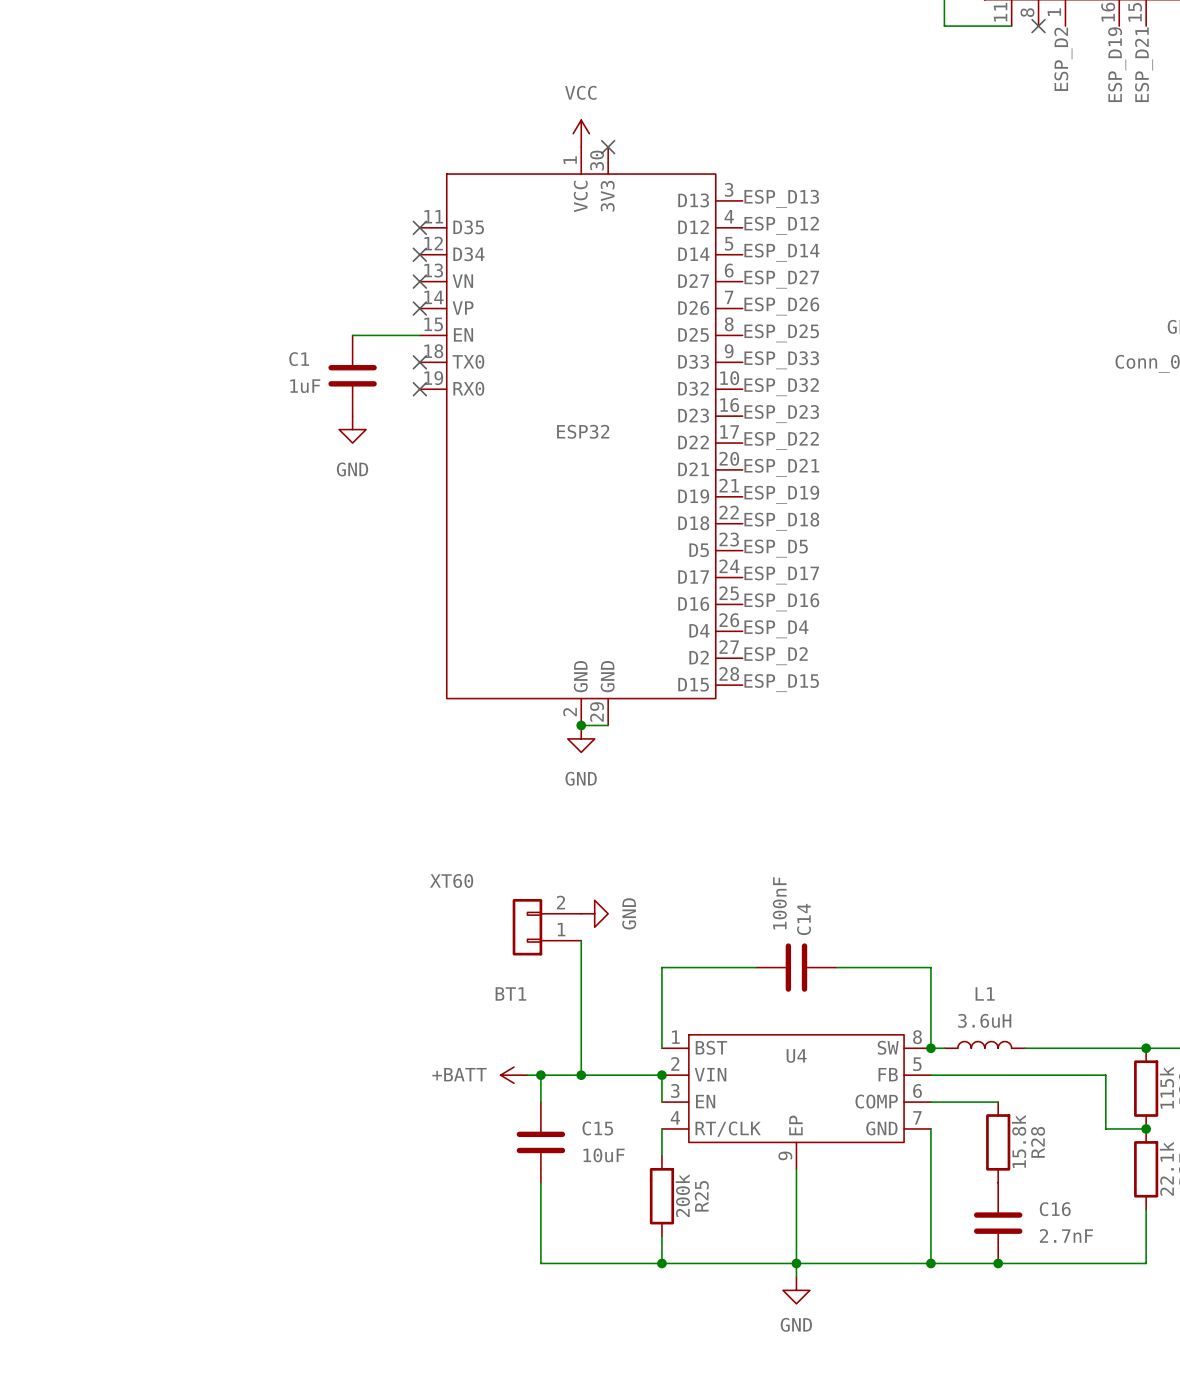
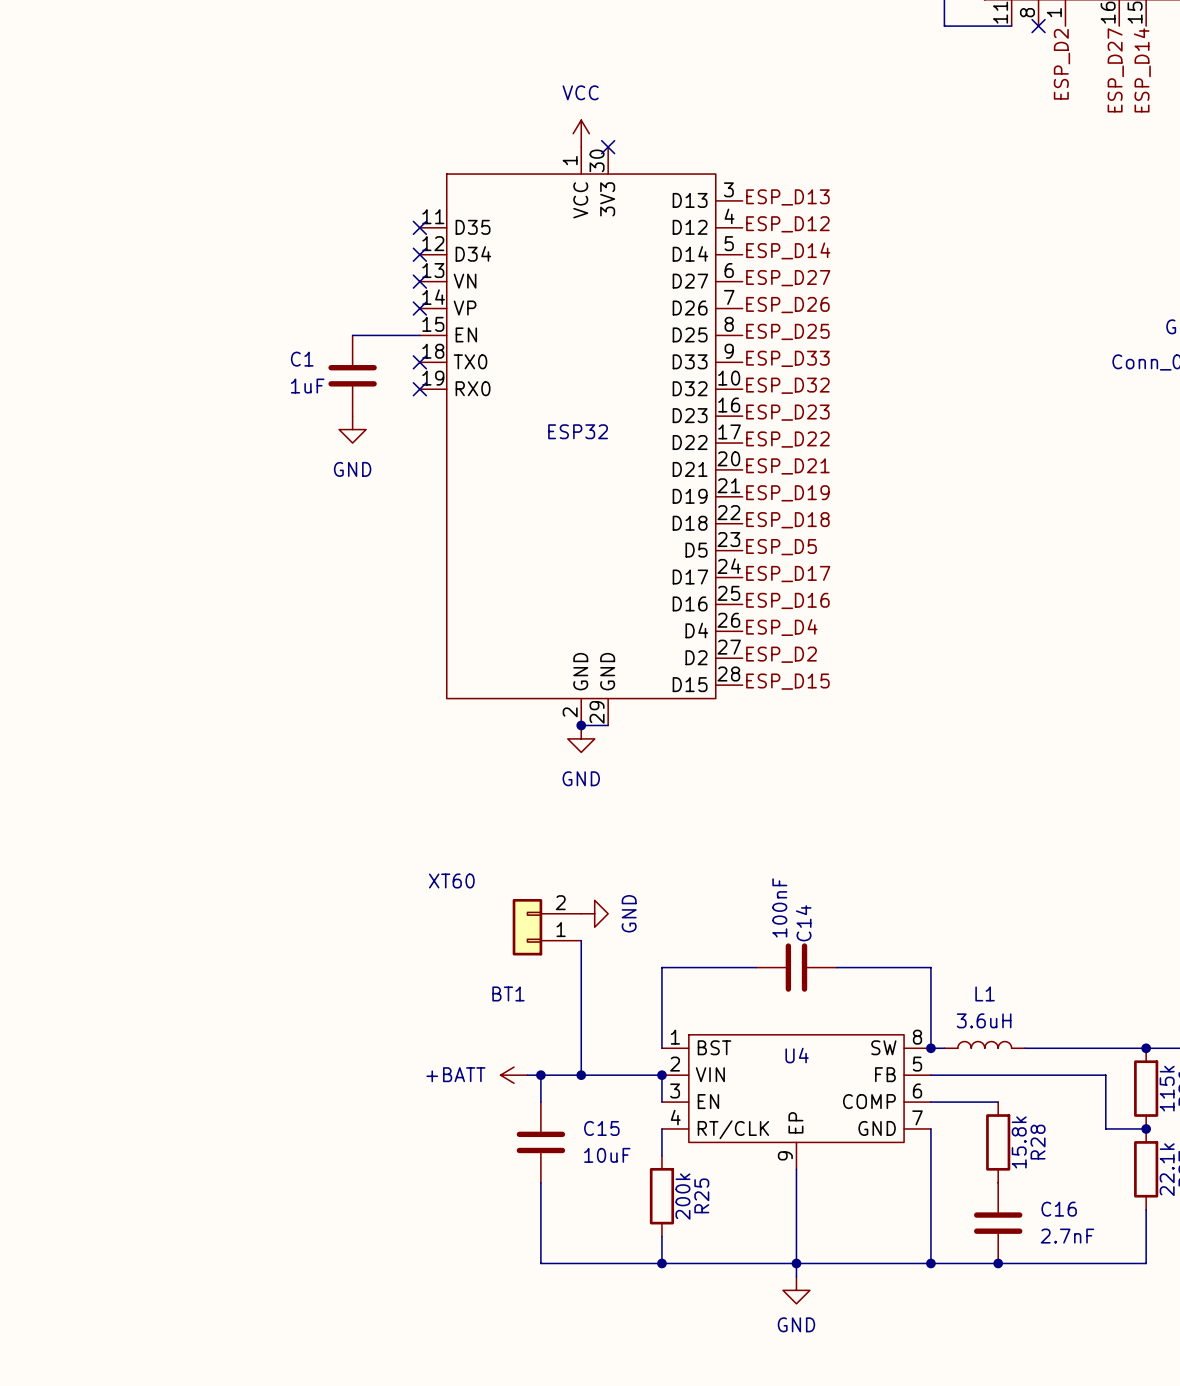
label: ESP_D19 (1117, 64) -> ESP_D27 (1115, 70)
label: ESP_D21 (1144, 64) -> ESP_D14 (1142, 70)

